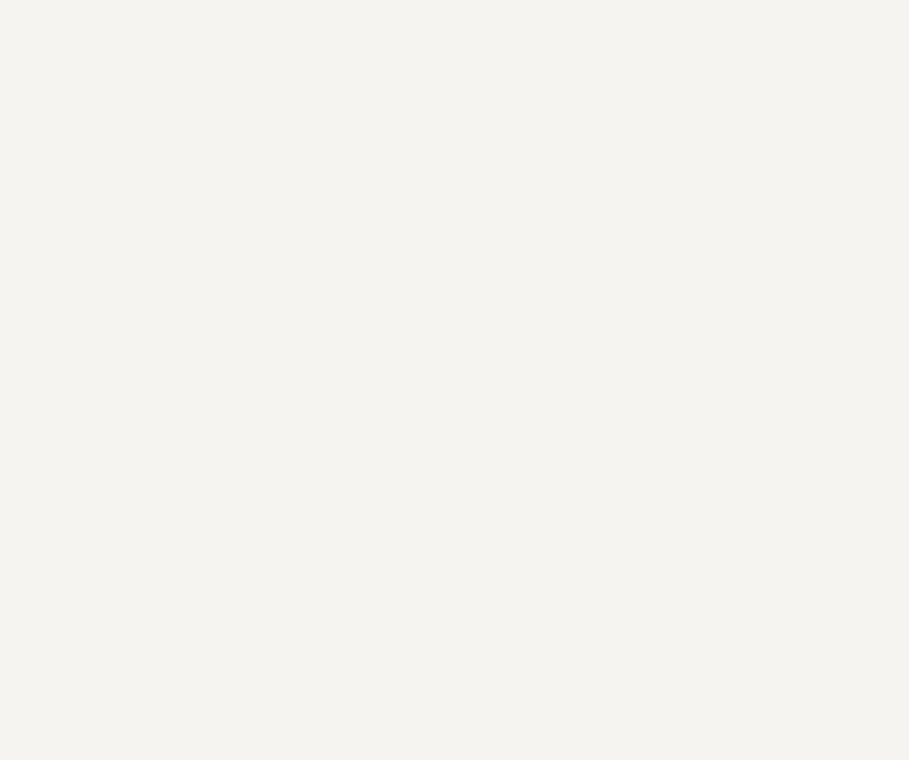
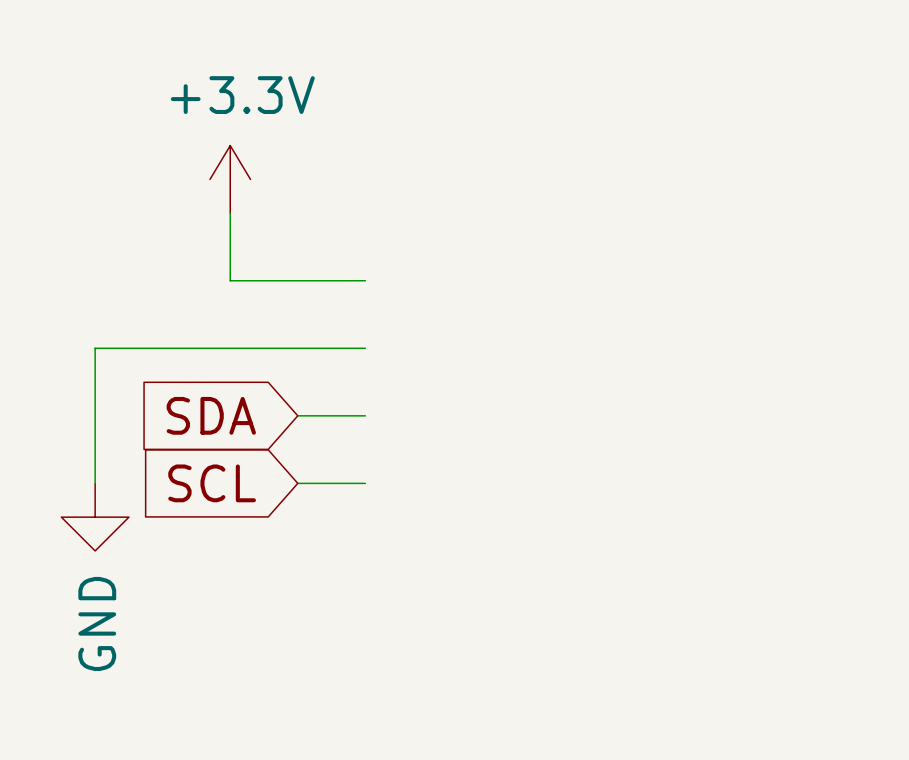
power symbol: none -> +3.3V (230, 179)
wire: none -> (230, 213) (230, 280) (365, 280)
wire: none -> (365, 348) (95, 348) (95, 483)
global label: none -> SDA (211, 415)
wire: none -> (297, 415) (365, 415)
global label: none -> SCL (212, 483)
wire: none -> (297, 483) (365, 483)
power symbol: none -> GND (95, 517)

